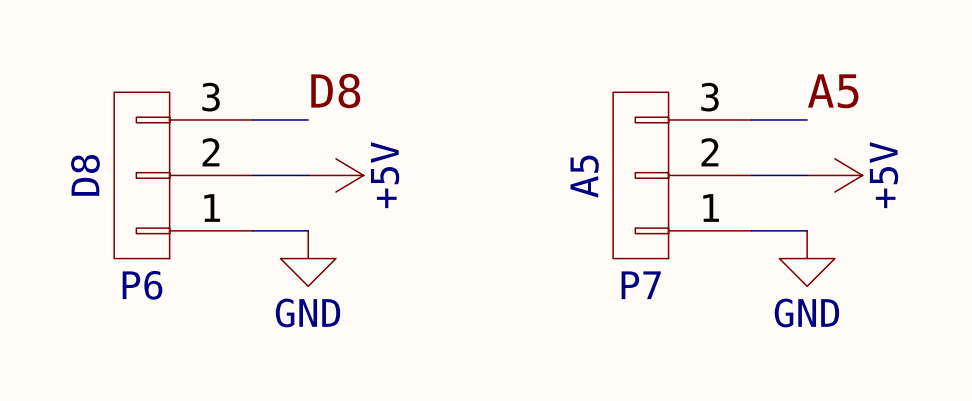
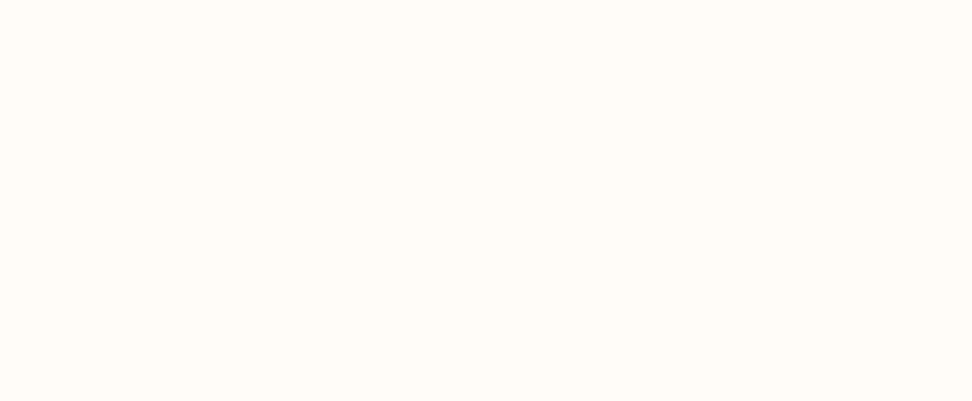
label: D8 (335, 90) -> none
label: A5 (833, 91) -> none
wire: (252, 119) (308, 119) -> none
wire: (751, 119) (807, 119) -> none
P6: D8 (183, 175) -> none
wire: (252, 175) (308, 175) -> none
power symbol: +5V (335, 175) -> none
P7: A5 (682, 175) -> none
wire: (751, 175) (807, 175) -> none
power symbol: +5V (834, 175) -> none
wire: (252, 230) (308, 230) -> none
wire: (751, 230) (807, 230) -> none
power symbol: GND (308, 258) -> none
power symbol: GND (807, 258) -> none

